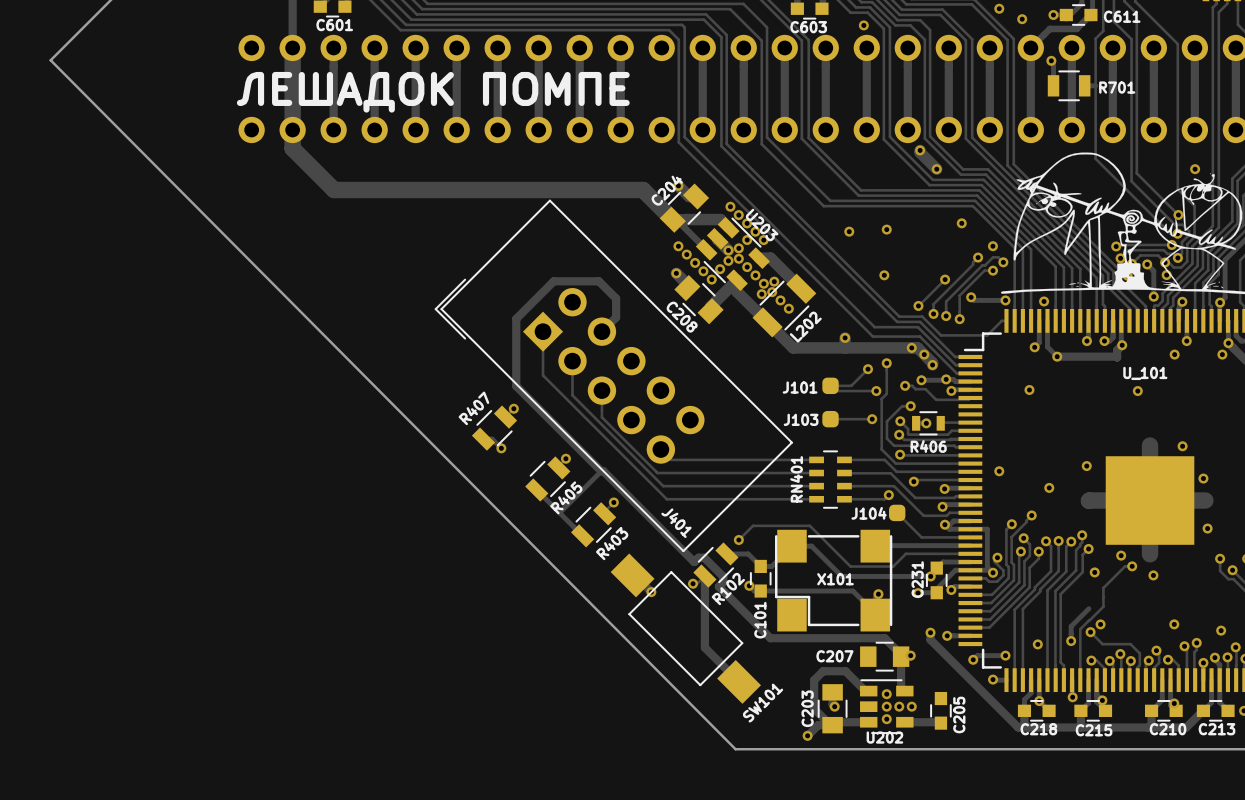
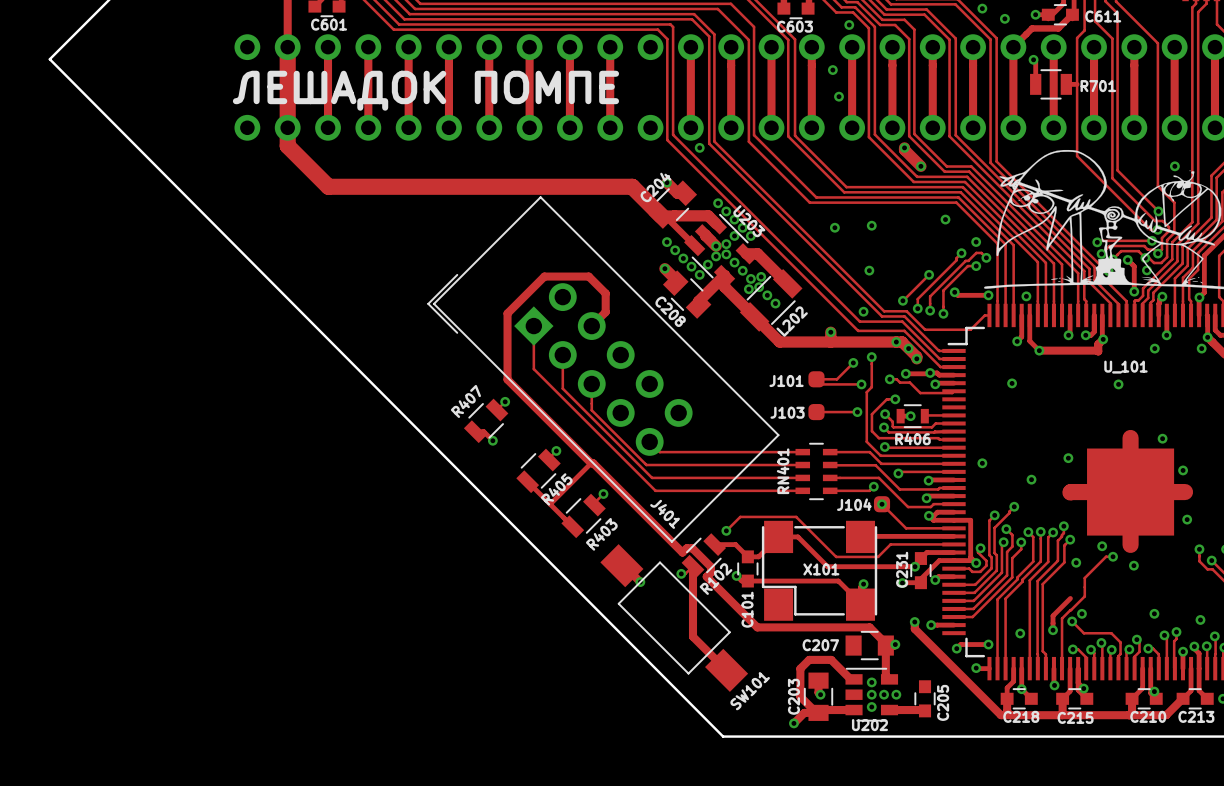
via: none -> (832, 70)
via: none -> (839, 96)
via: none -> (699, 147)
via: none -> (863, 311)
via: none -> (882, 504)

